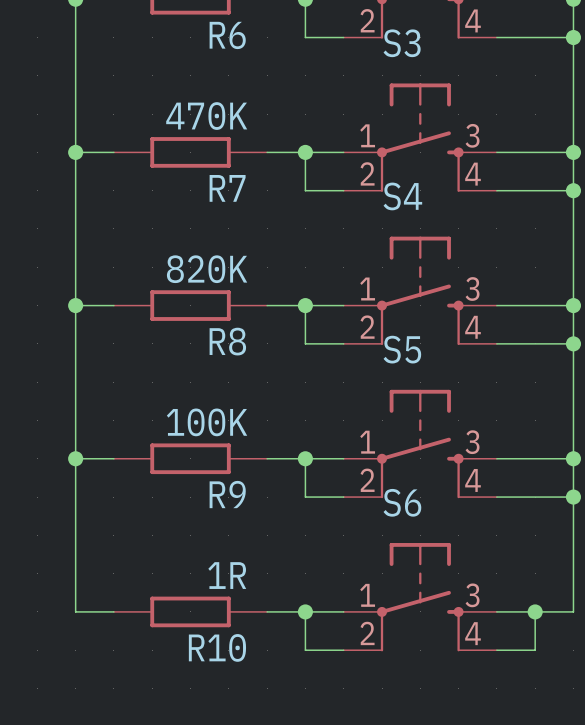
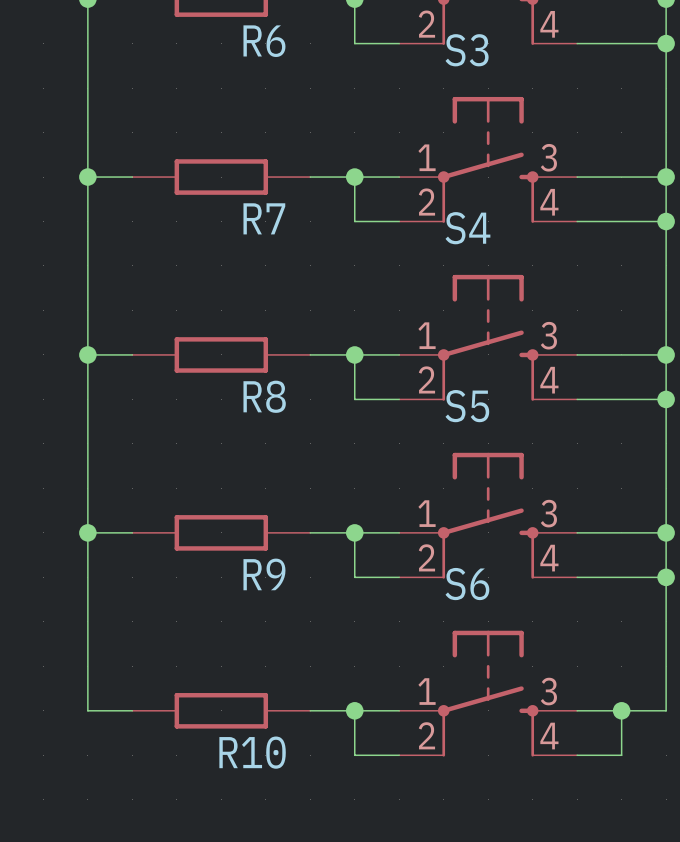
R7 value: 470K (206, 116) -> none
R8 value: 820K (207, 269) -> none
R9 value: 100K (207, 422) -> none
R10 value: 1R (227, 575) -> none

